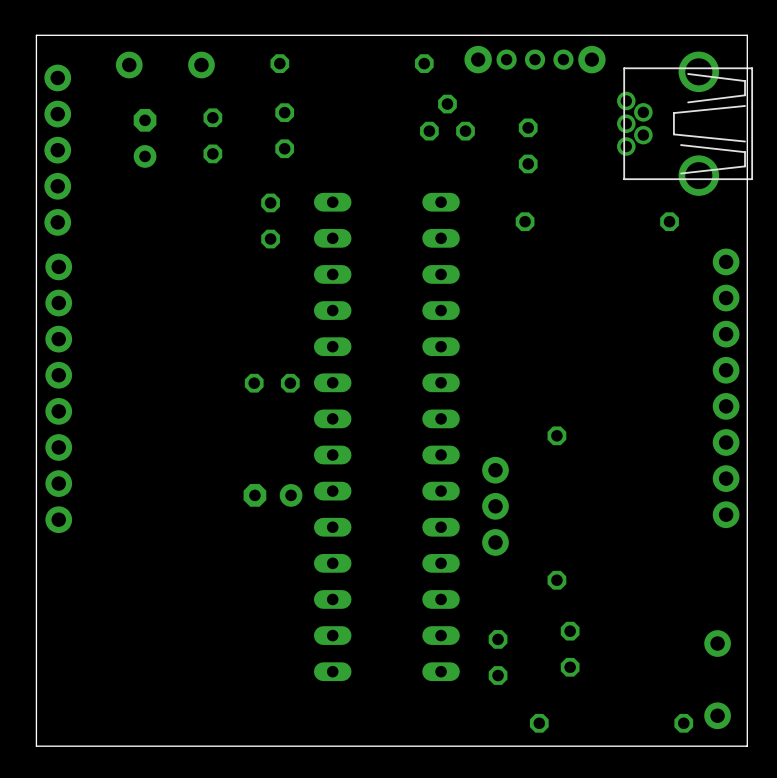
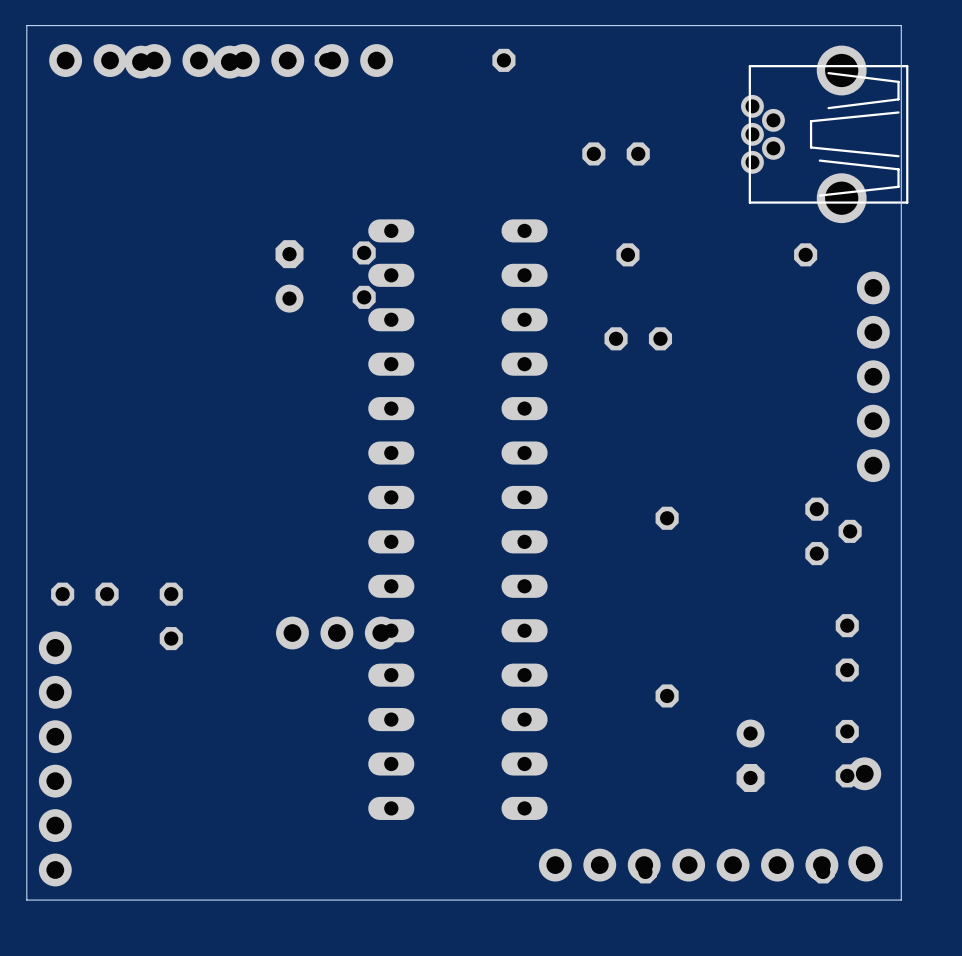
part: (535, 59) -> none
part: none -> (221, 60)
part: (447, 117) -> none
part: (284, 130) -> none
part: (212, 135) -> none
part: (145, 138) -> none
part rotation: 0° (528, 145) -> 90° clockwise (616, 153)
part: (57, 150) -> none
part position: (270, 220) -> (364, 275)
part: none -> (289, 276)
part: none -> (638, 338)
part: none -> (873, 376)
part: (272, 383) -> none
part: (726, 388) -> none
part: (58, 393) -> none
part: none -> (833, 531)
part: (273, 495) -> none
part: none -> (84, 594)
part rotation: 0° (495, 506) -> 90° clockwise (336, 633)
part position: (495, 506) -> (336, 633)
part: none -> (171, 616)
part: none -> (847, 647)
part: none -> (847, 753)
part: none -> (750, 755)
part: none -> (55, 758)
part: (570, 649) -> none
part: (498, 657) -> none
part: none -> (710, 865)

